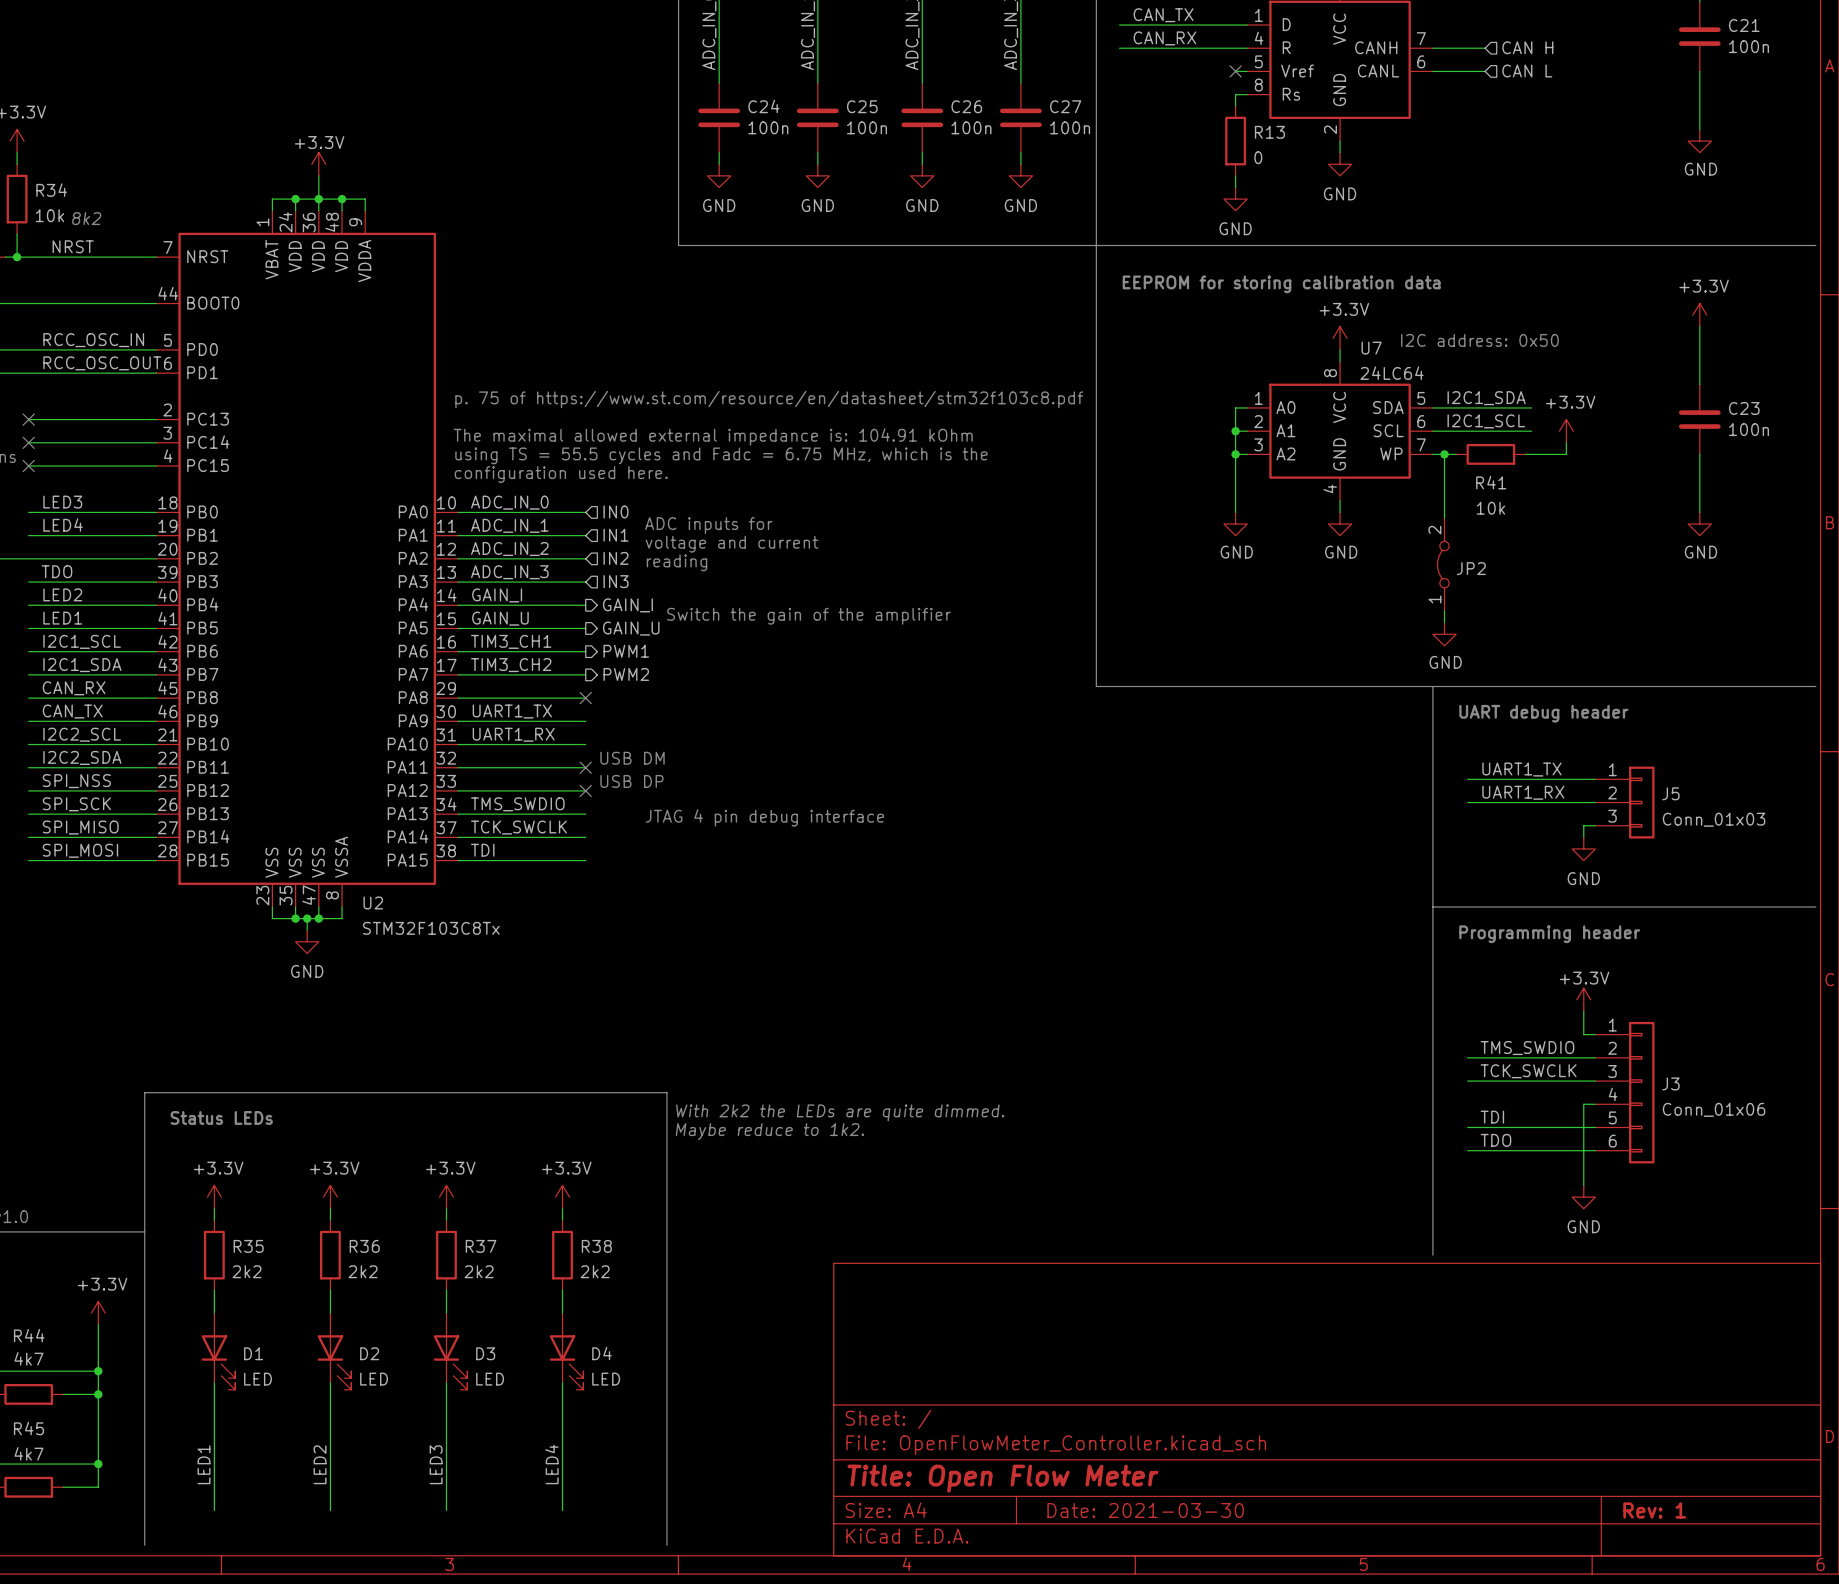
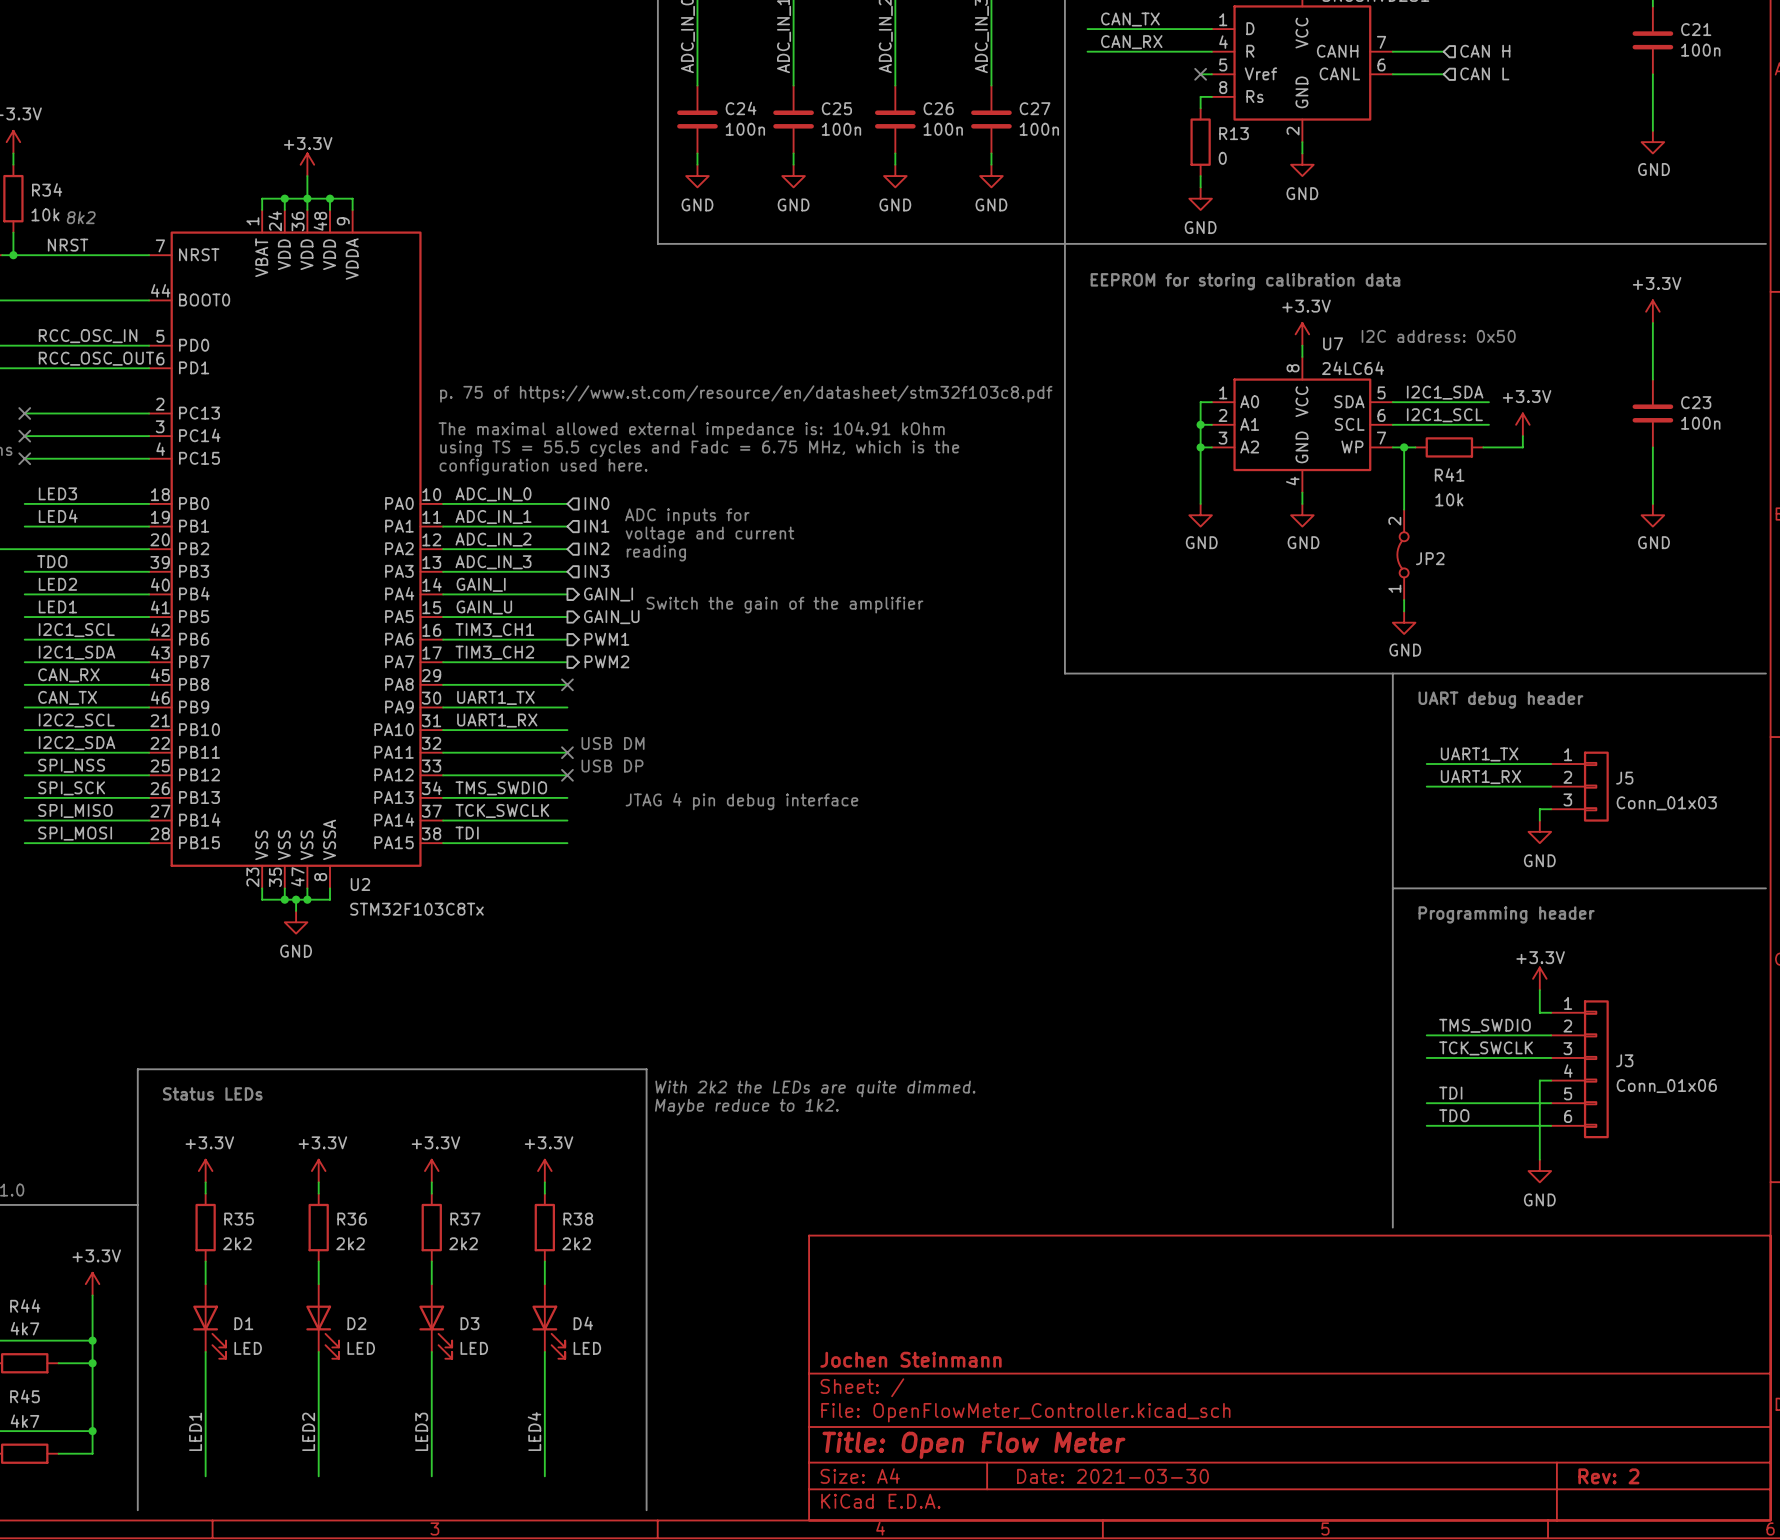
title block: none -> Jochen Steinmann (910, 1359)
title block: Rev: 1 (1654, 1510) -> Rev: 2 (1608, 1476)

